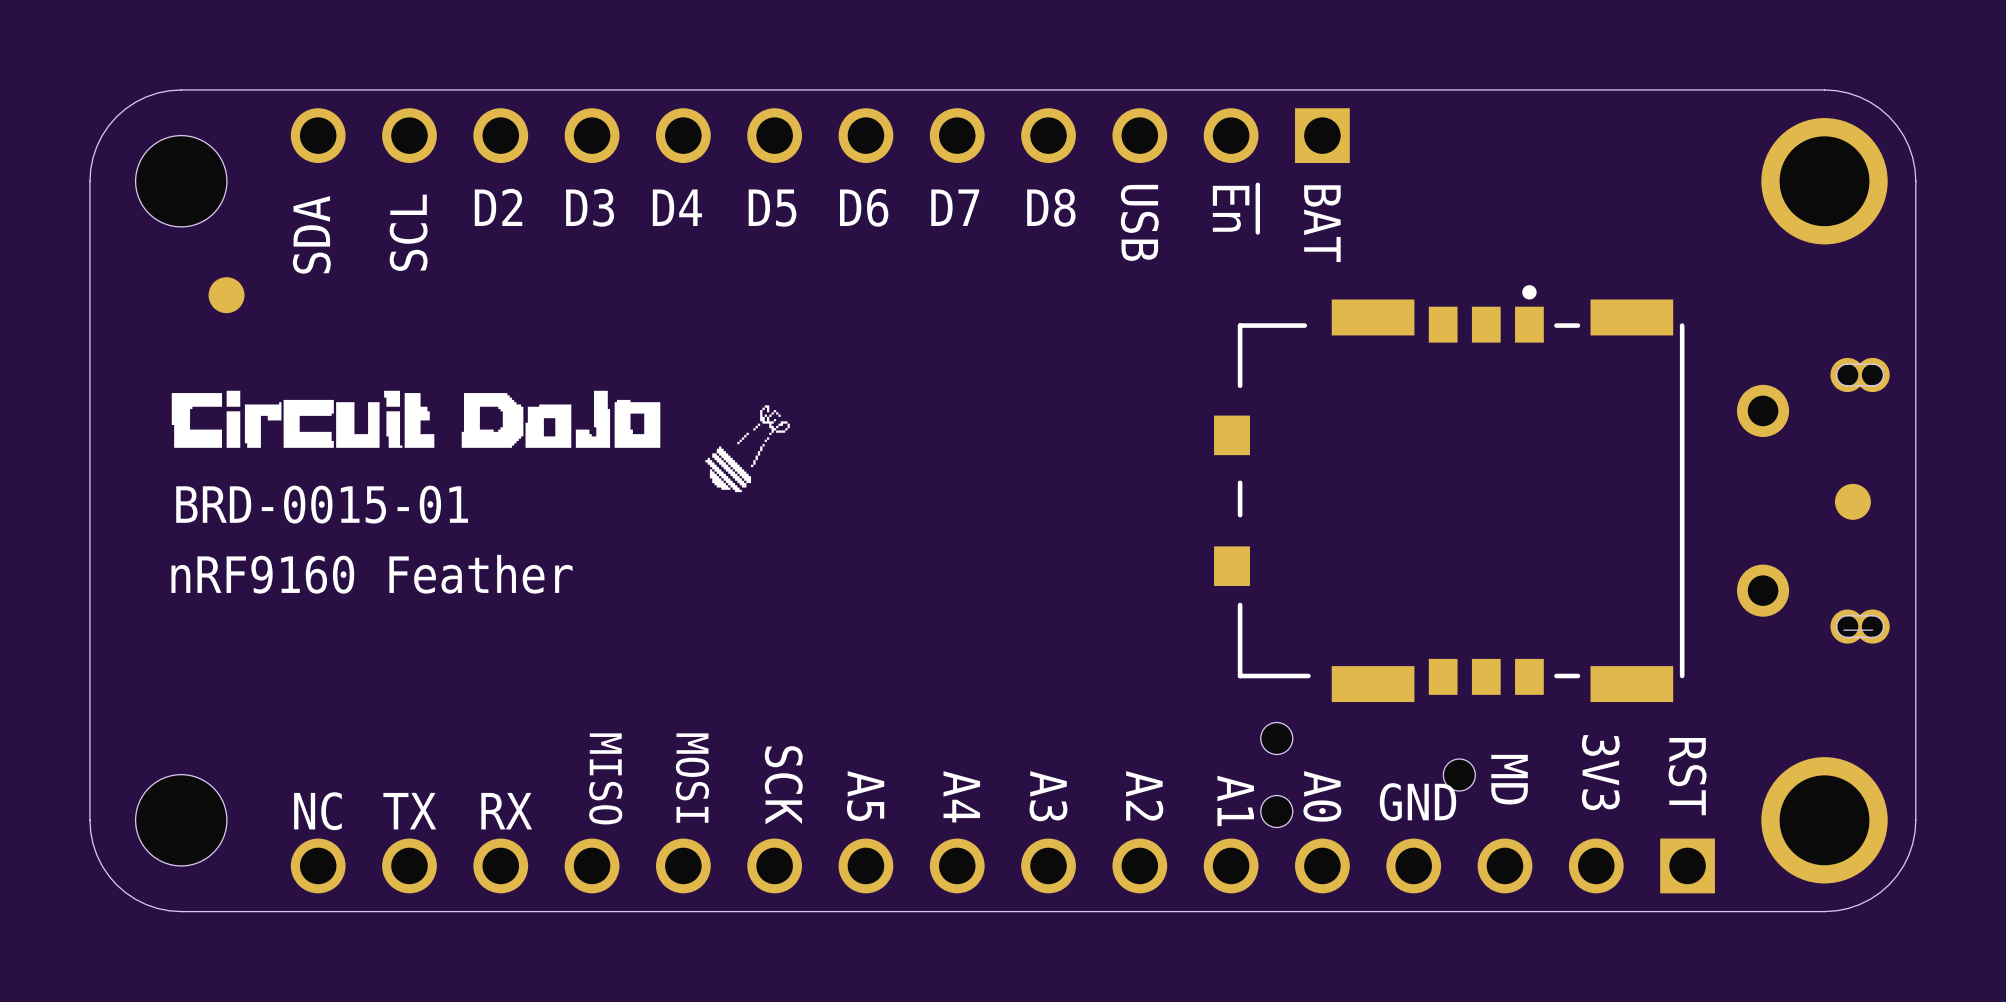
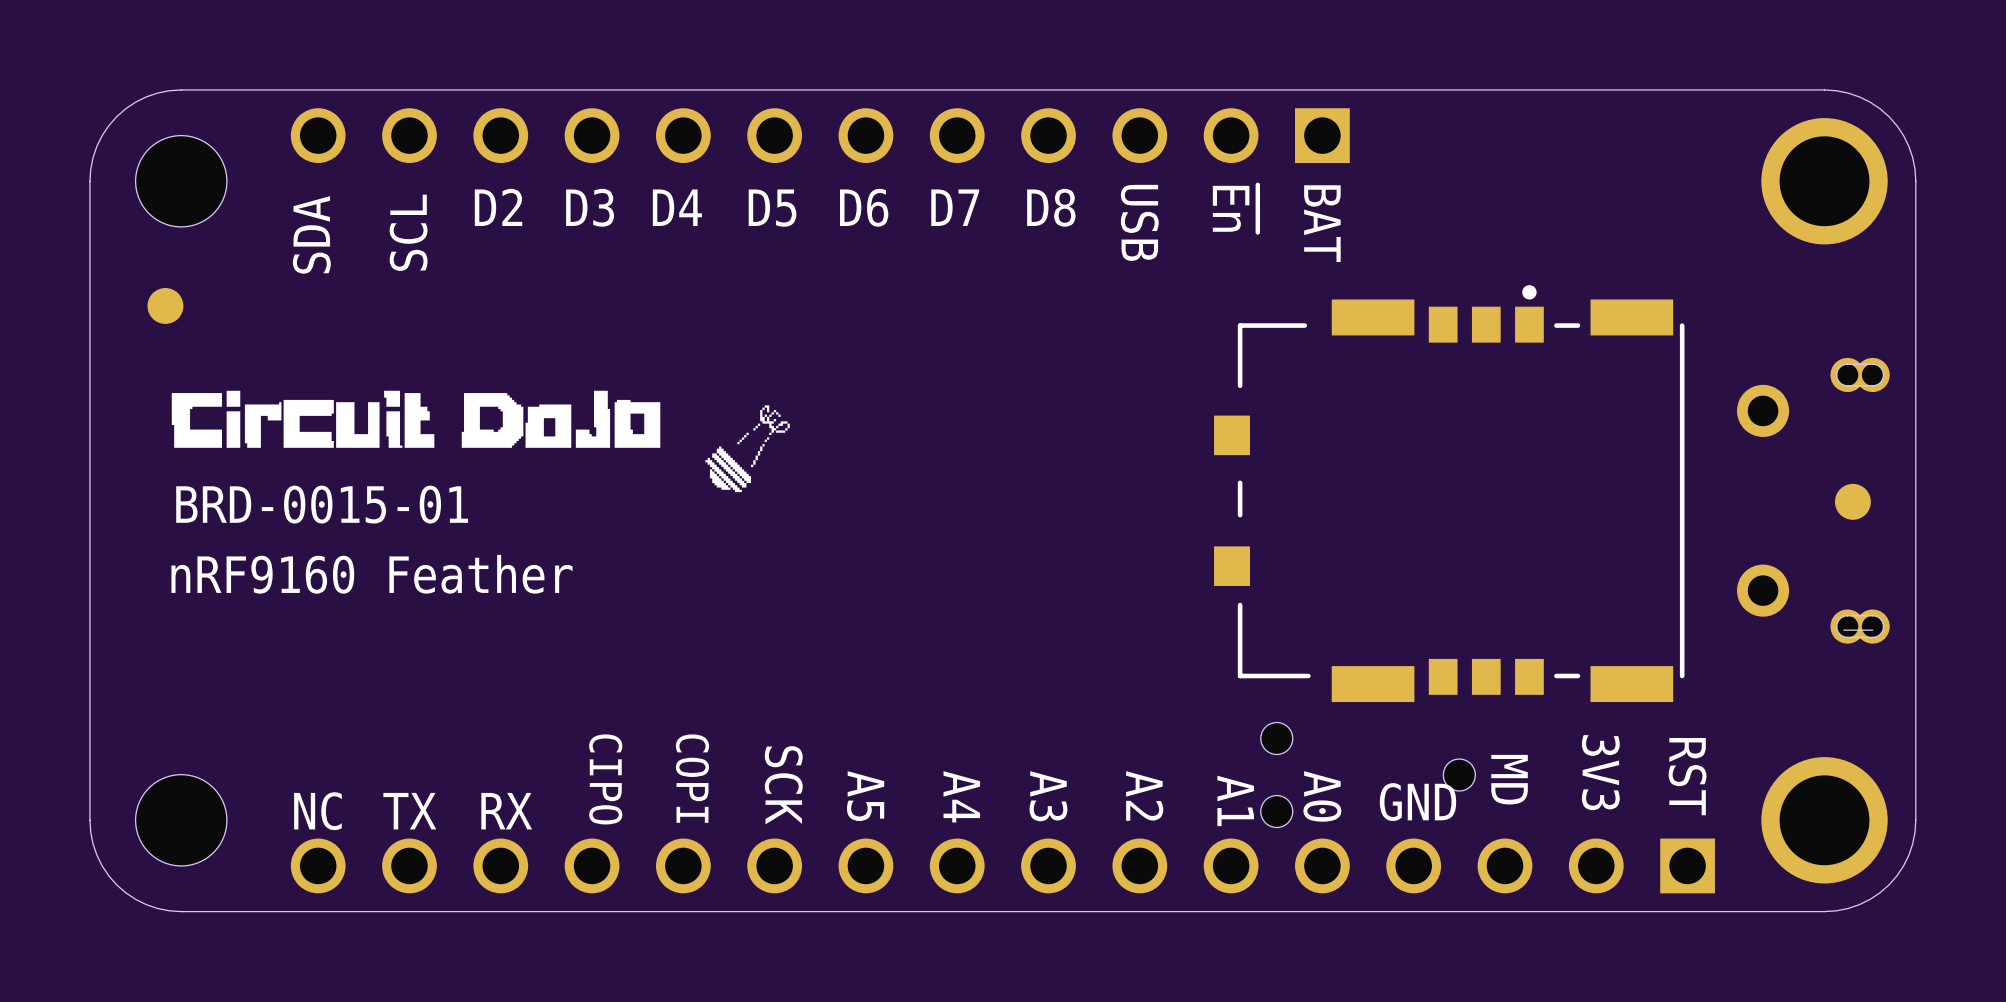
part position: (226, 295) -> (165, 305)
text: MISO (605, 778) -> CIPO (605, 779)
text: MOSI (692, 778) -> COPI (692, 778)

